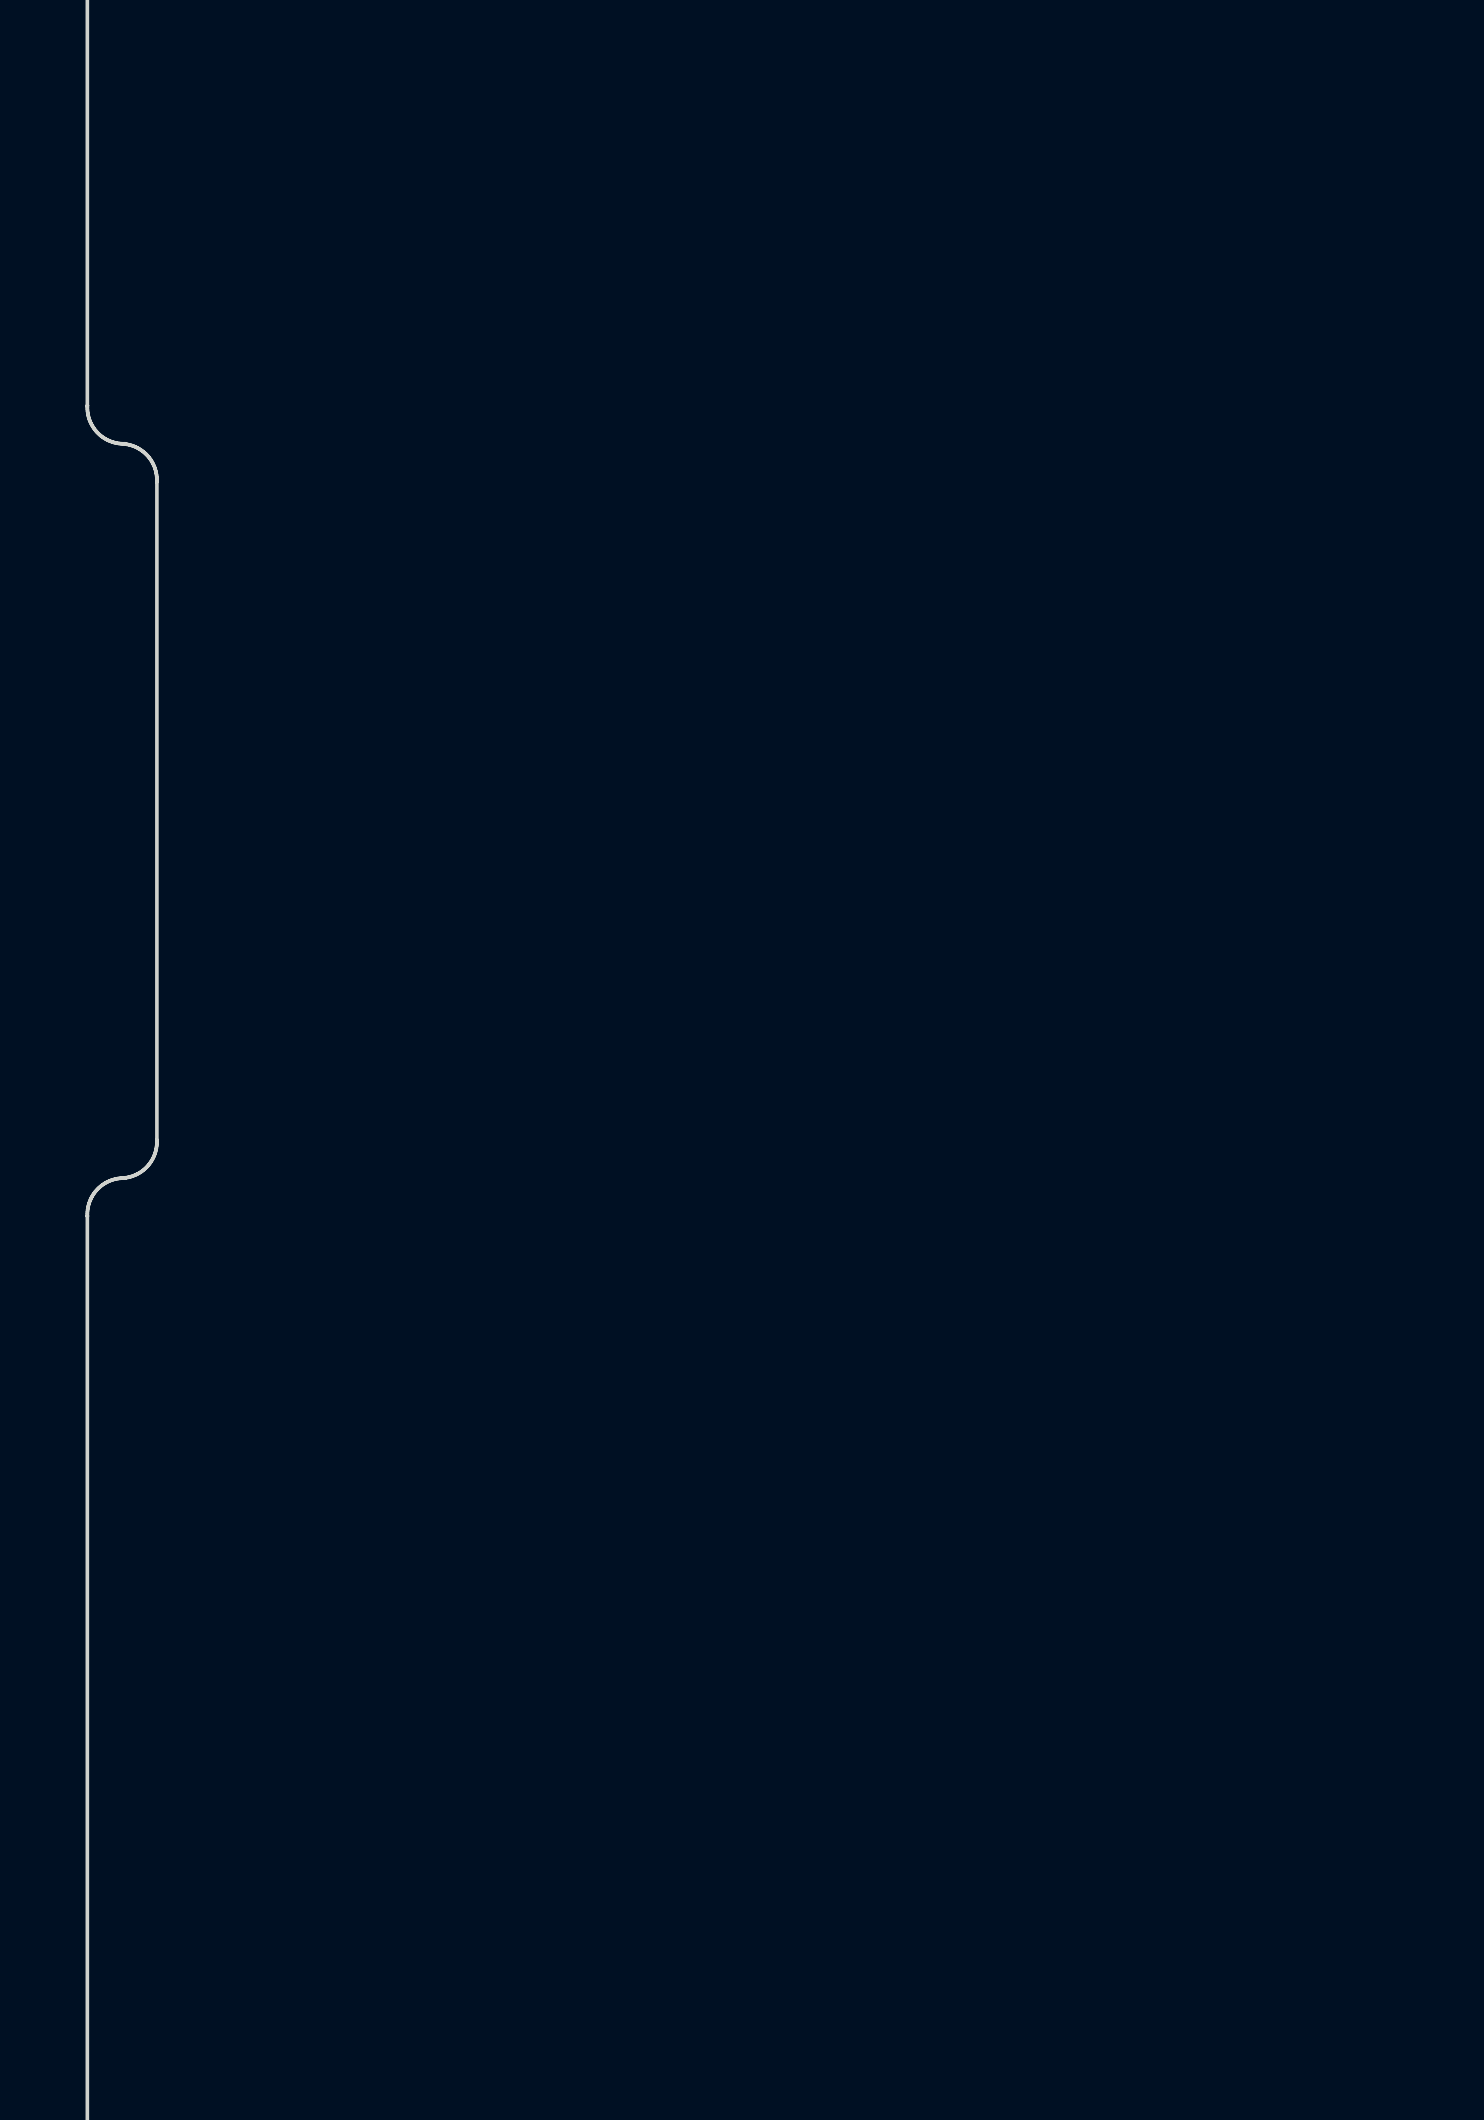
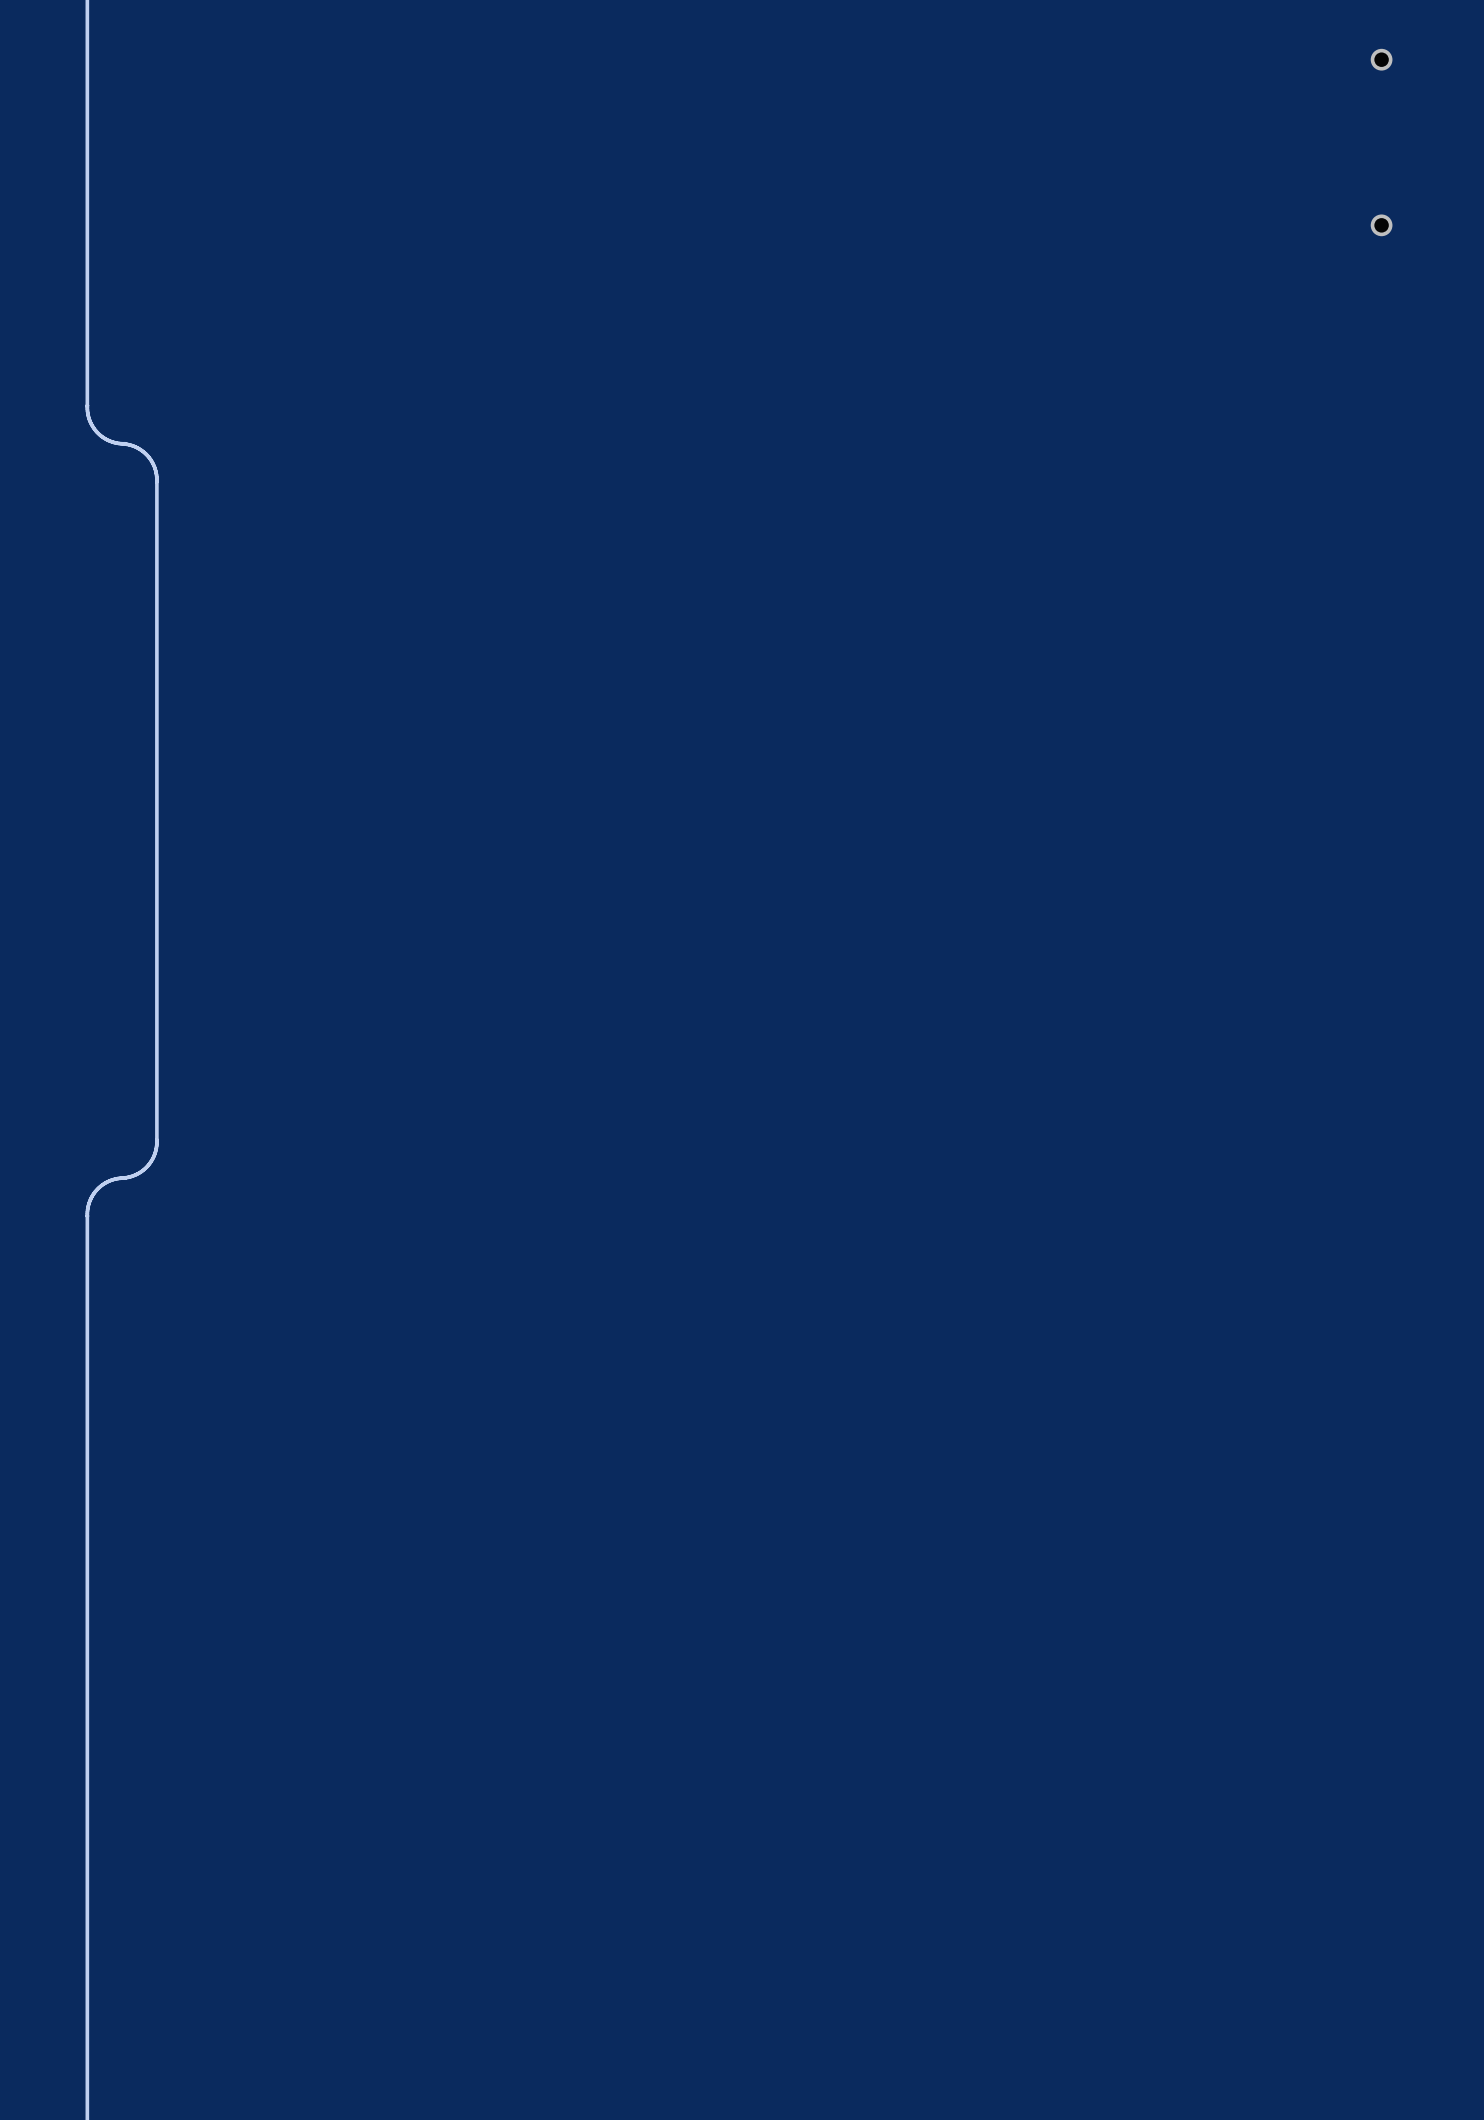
via: none -> (1381, 59)
via: none -> (1381, 225)

